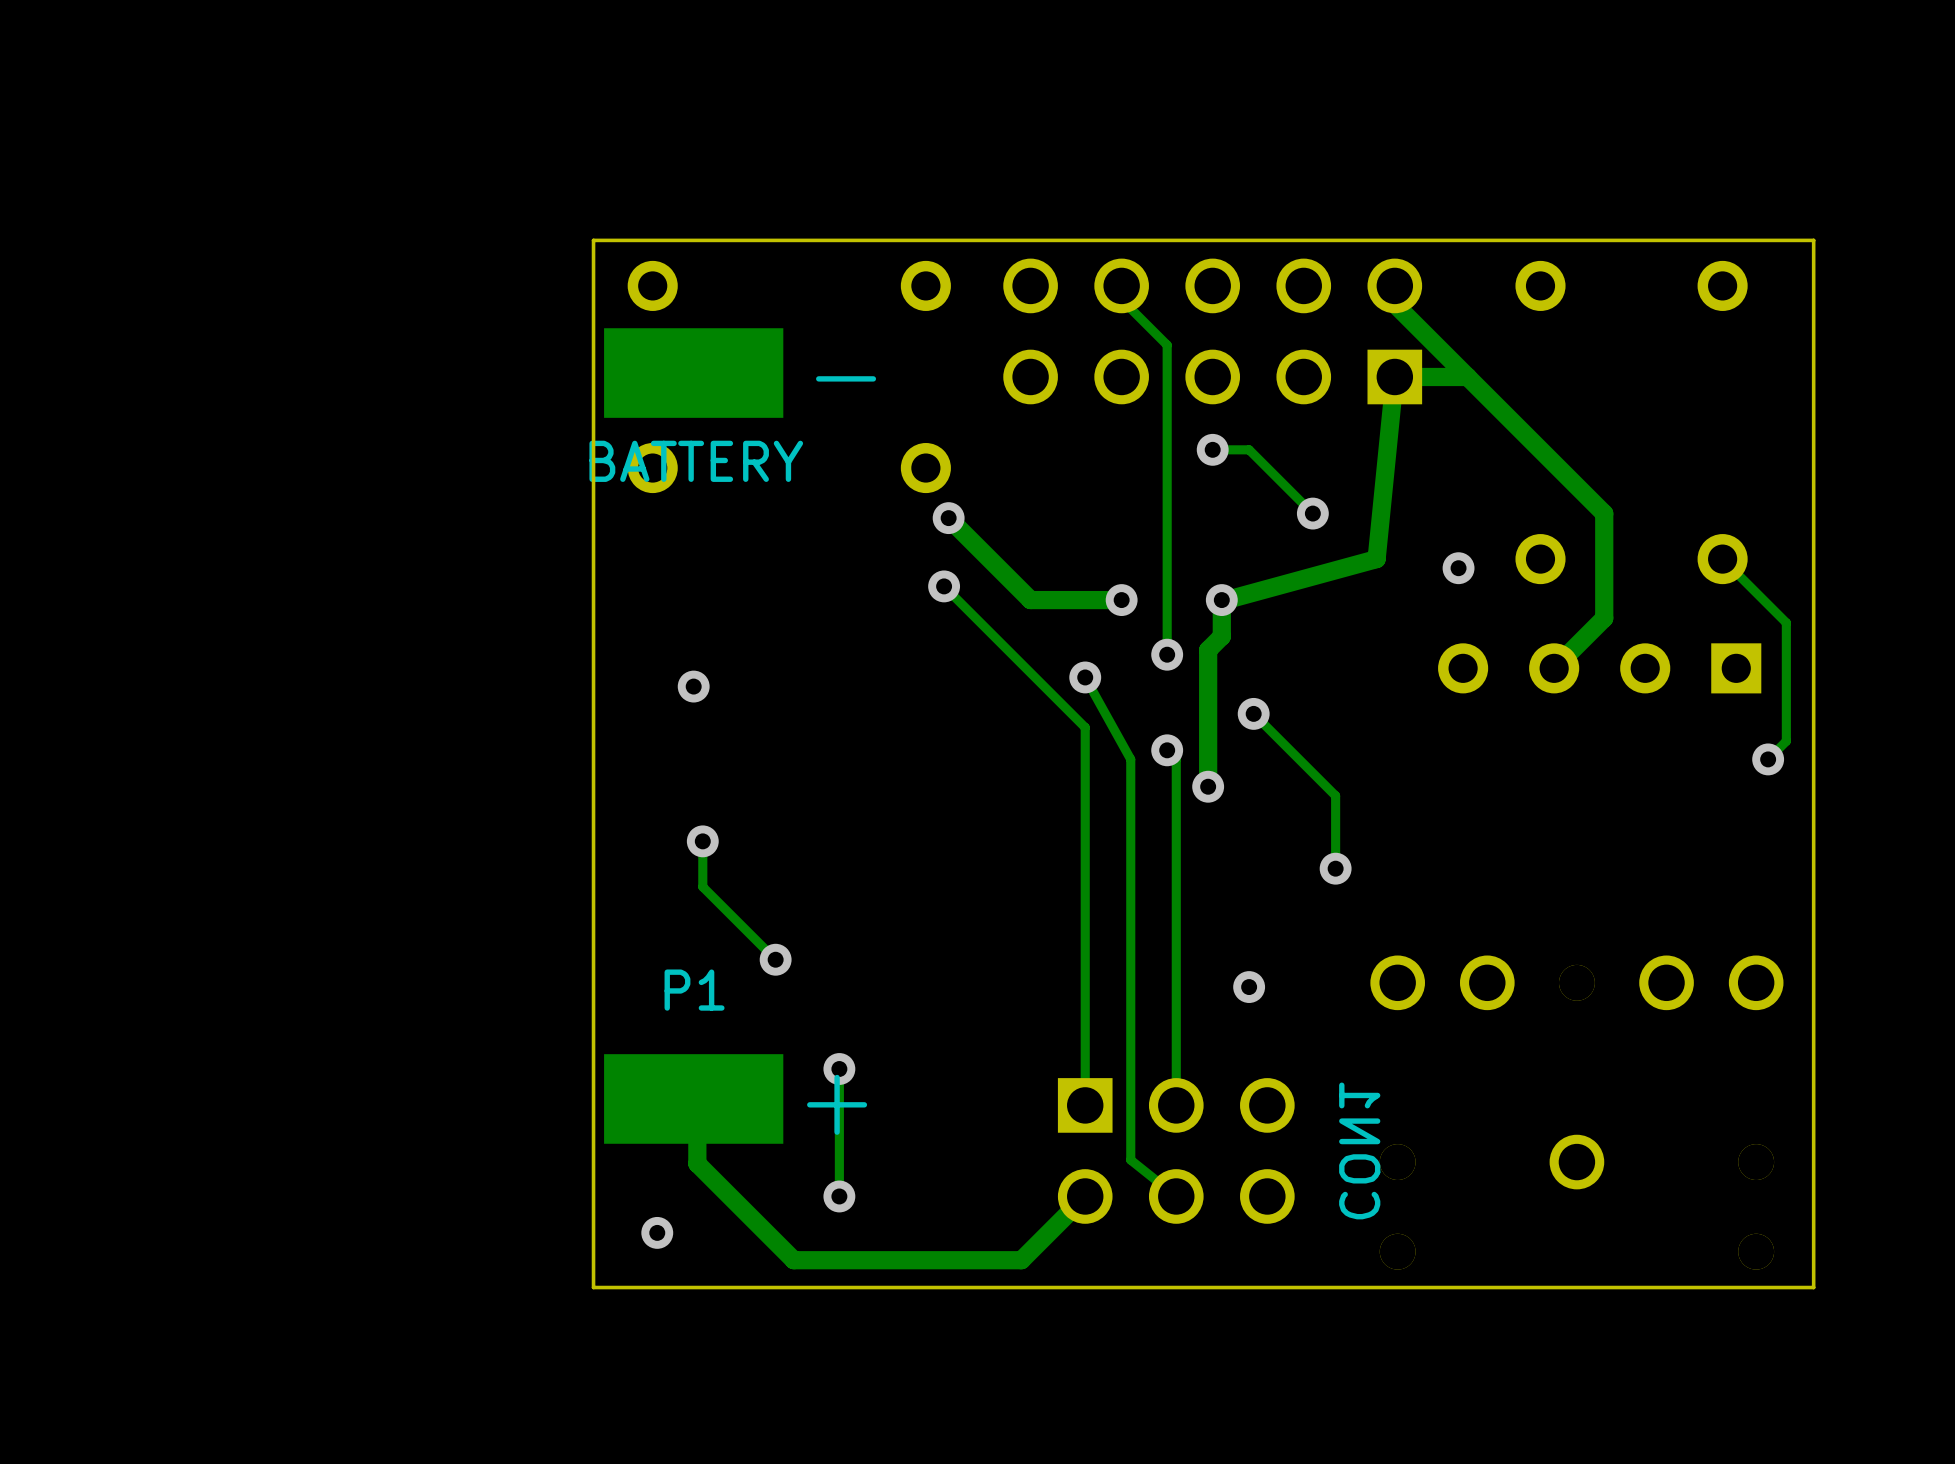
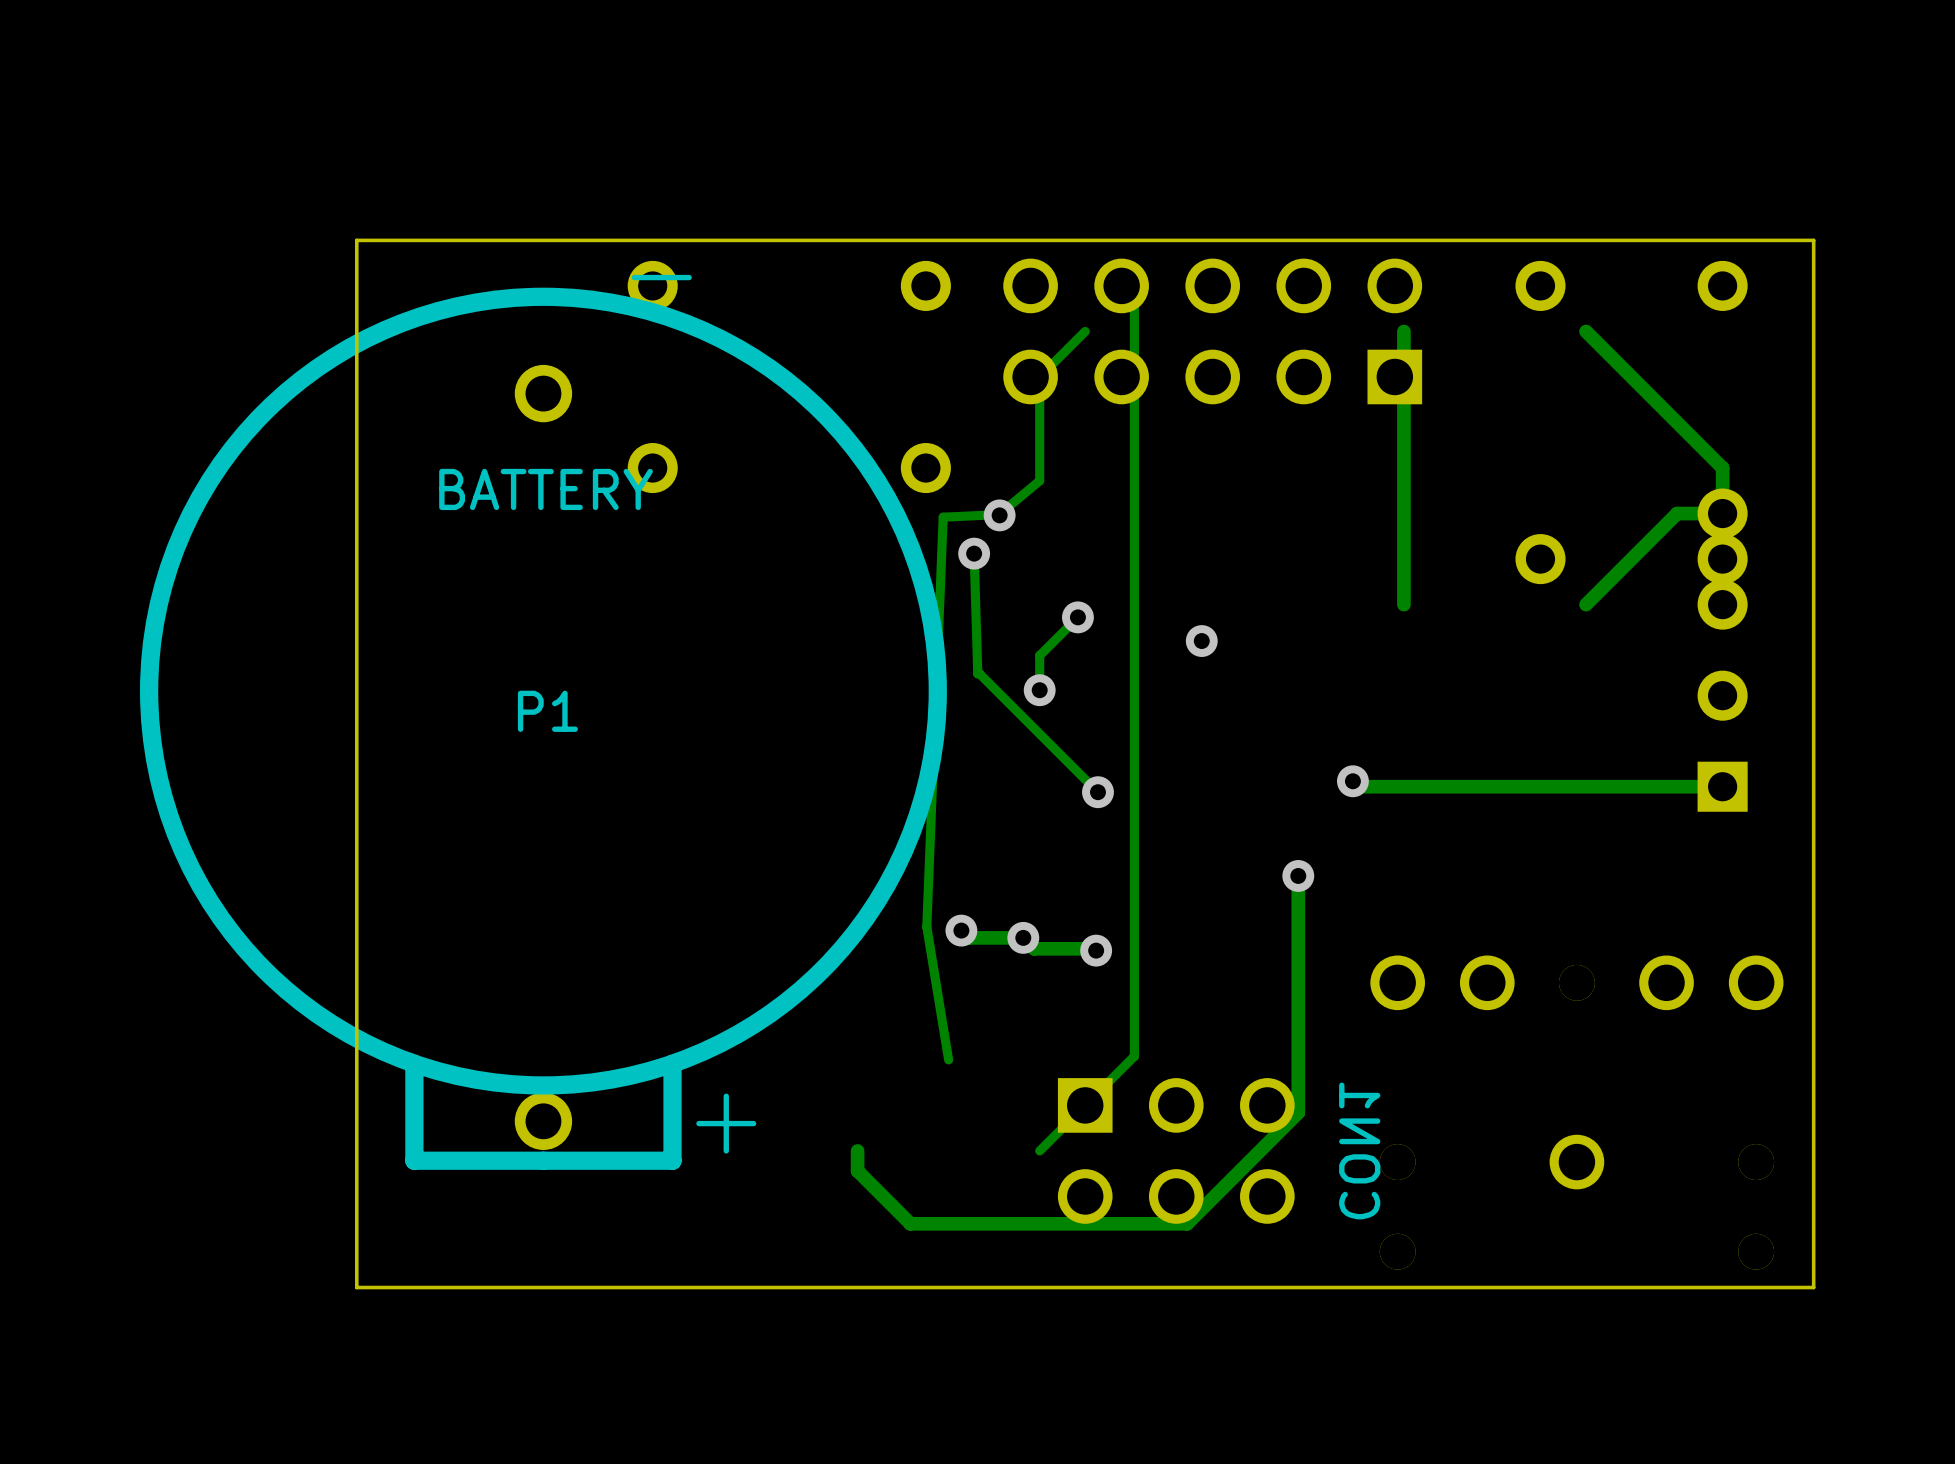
board edge: (593, 240) (593, 1287) -> (593, 240) (356, 240) (356, 1287) (593, 1287)
track: none -> (1114, 273) (1134, 293) (1134, 1056) (1039, 1150)
track: (1121, 285) (1121, 299) (1167, 345) (1167, 654) -> none
track: (1394, 285) (1394, 304) (1604, 513) (1604, 618) (1554, 668) -> none
P1 footprint: [604, 328, 784, 1144] -> [140, 287, 947, 1170]
track: none -> (1085, 331) (1039, 376) (1039, 480) (999, 514)
track: none -> (1403, 331) (1403, 604)
track: none -> (1586, 331) (1722, 468) (1722, 513) (1677, 513) (1586, 604)
track: (1467, 376) (1394, 376) (1376, 559) (1221, 600) (1221, 636) (1208, 650) (1208, 786) -> none
track: (1212, 449) (1249, 449) (1312, 513) -> none
via: (1212, 449) -> none
via: (1312, 513) -> none
track: none -> (999, 514) (943, 517) (926, 926) (948, 1059)
via: none -> (999, 515)
track: (948, 518) (1030, 600) (1121, 600) -> none
via: (948, 518) -> none
track: none -> (974, 553) (977, 673) (1097, 792)
via: none -> (974, 553)
track: (1722, 559) (1786, 622) (1786, 741) (1768, 759) -> none
via: (1458, 568) -> none
track: (944, 586) (1085, 727) (1085, 1105) -> none
via: (944, 586) -> none
via: (1121, 600) -> none
via: (1221, 600) -> none
track: none -> (1077, 617) (1039, 655) (1039, 690)
via: none -> (1077, 617)
via: none -> (1201, 641)
via: (1167, 654) -> none
part rotation: 0° (1599, 668) -> 90° clockwise (1722, 650)
track: (1085, 677) (1130, 759) (1130, 1160) (1176, 1196) -> none
via: (1085, 677) -> none
via: (693, 686) -> none
via: none -> (1039, 690)
track: (1253, 713) (1335, 795) (1335, 868) -> none
via: (1253, 713) -> none
track: (1167, 750) (1176, 759) (1176, 1105) -> none
via: (1167, 750) -> none
via: (1768, 759) -> none
track: none -> (1352, 781) (1358, 786) (1722, 786)
via: none -> (1352, 781)
via: (1208, 786) -> none
via: none -> (1097, 792)
track: (702, 841) (702, 886) (775, 959) -> none
via: (702, 841) -> none
via position: (1335, 868) -> (1298, 875)
track: none -> (1298, 875) (1298, 1112) (1187, 1223) (910, 1223) (857, 1170) (857, 1150)
track: none -> (961, 930) (968, 937) (1023, 937) (1034, 948) (1094, 948) (1096, 950)
via: none -> (961, 930)
via: none -> (1023, 937)
via: none -> (1096, 950)
via: (775, 959) -> none
via: (1249, 987) -> none
P1 name position: P1 (694, 990) -> P1 (547, 711)
track: (839, 1069) (839, 1196) -> none
via: (839, 1069) -> none
track: (697, 1098) (697, 1163) (793, 1260) (1021, 1260) (1085, 1196) -> none
via: (839, 1196) -> none
via: (657, 1232) -> none

